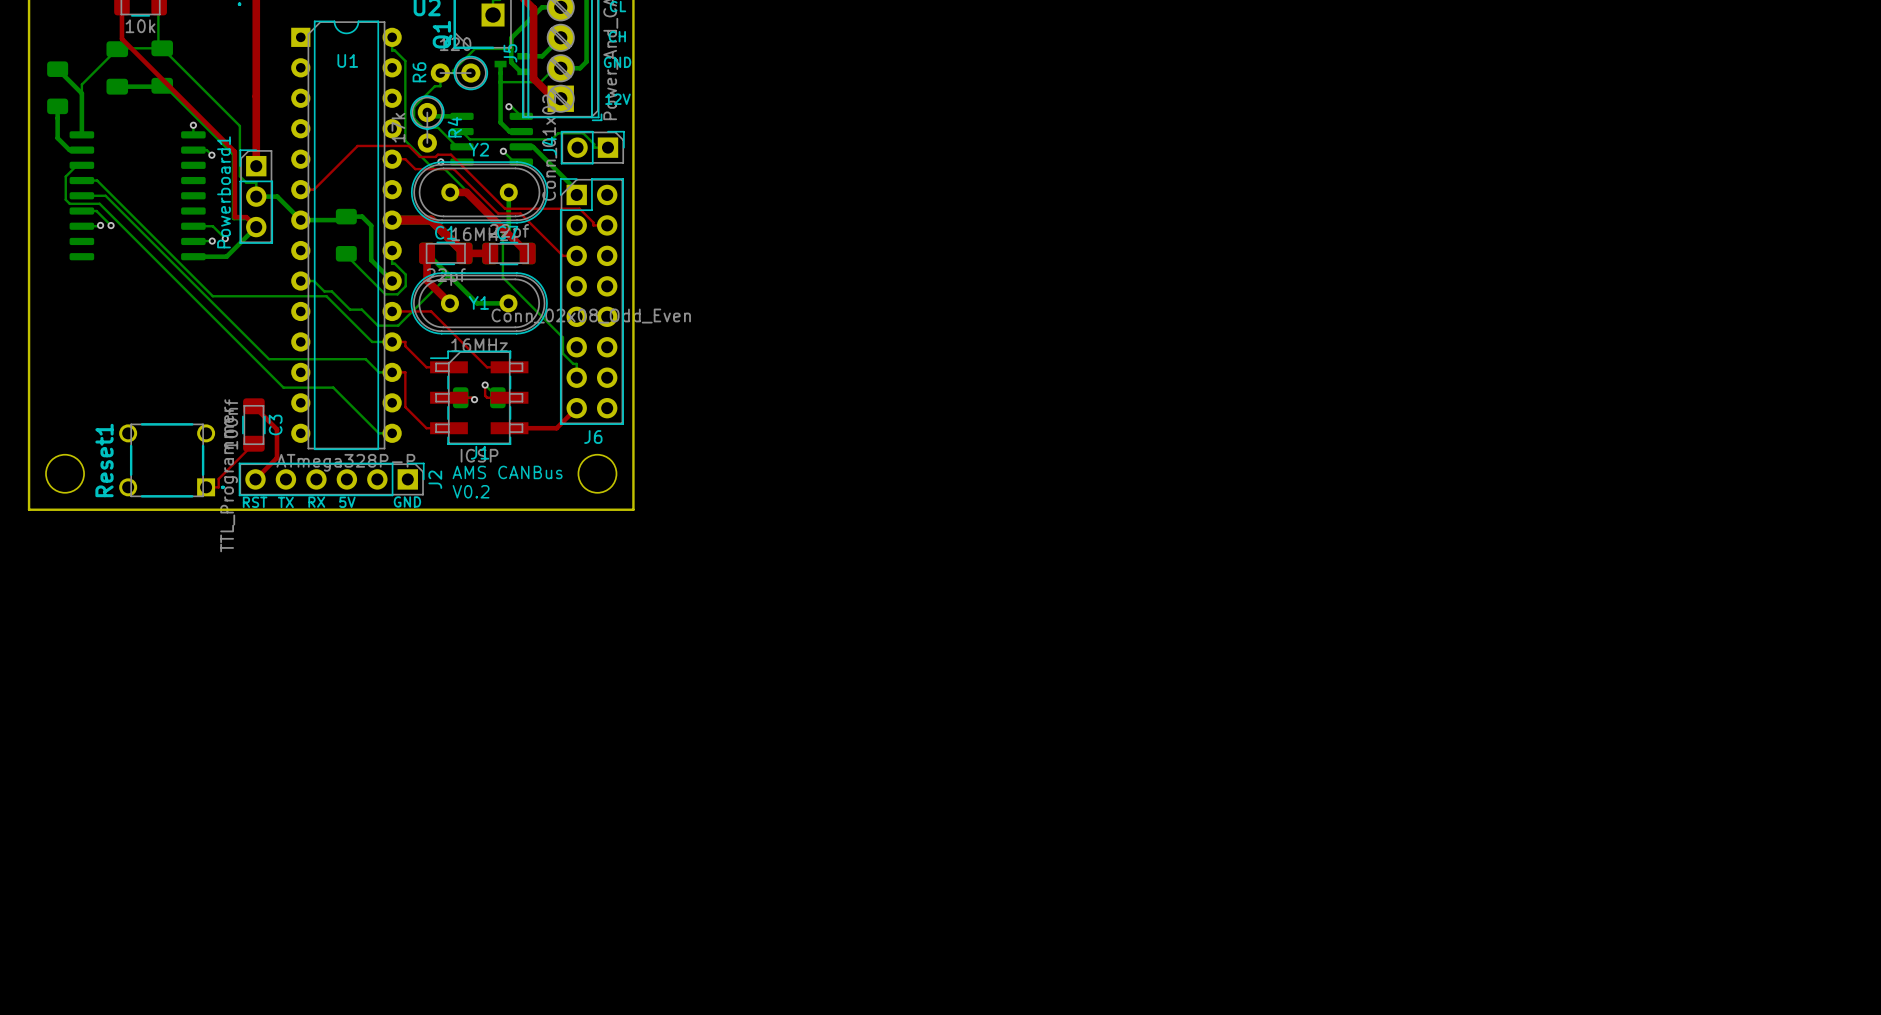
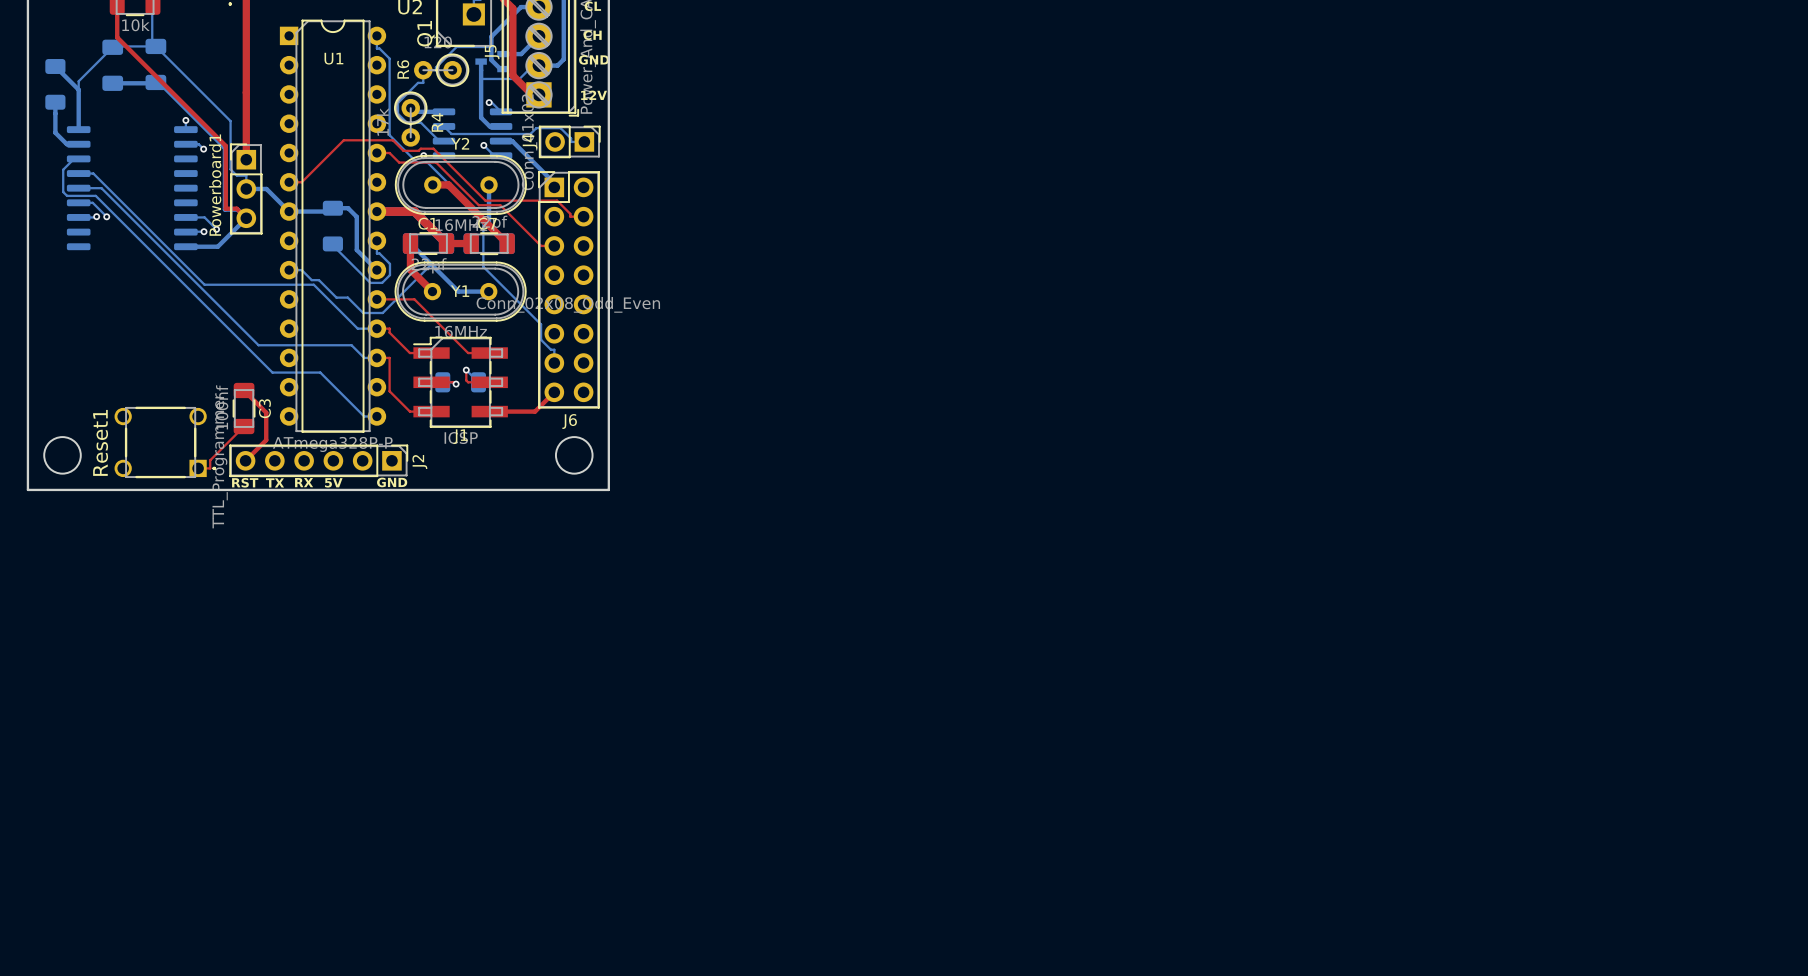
text: AMS CANBus (507, 472) -> none
text: V0.2 (471, 491) -> none

